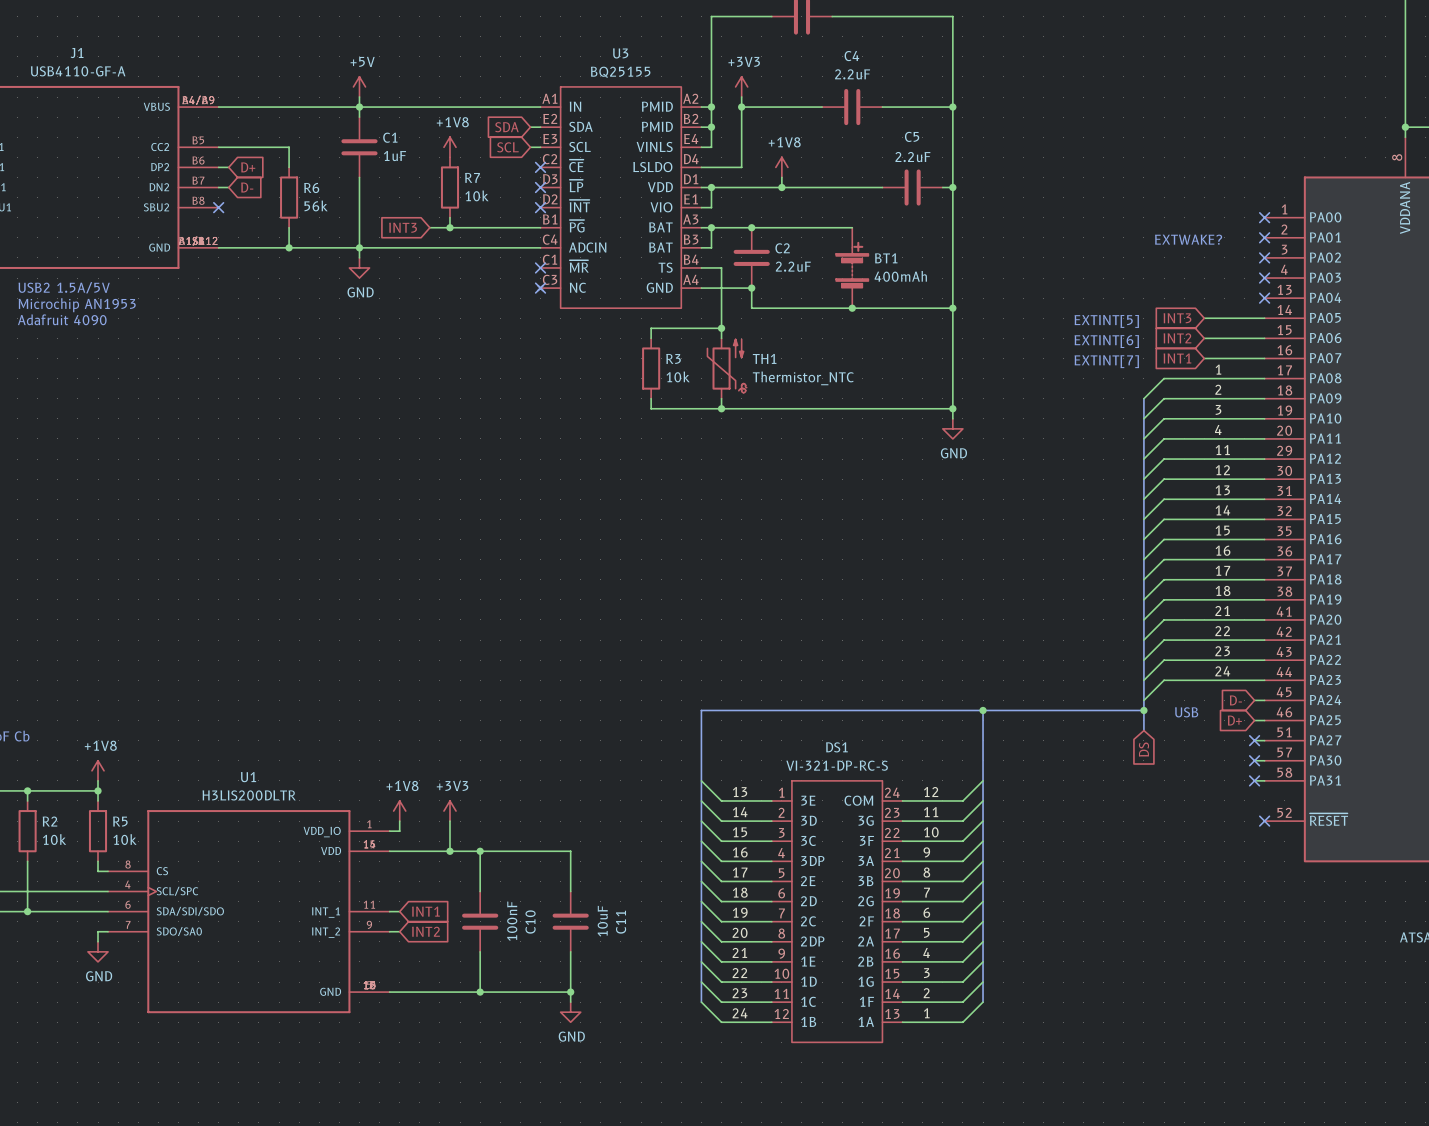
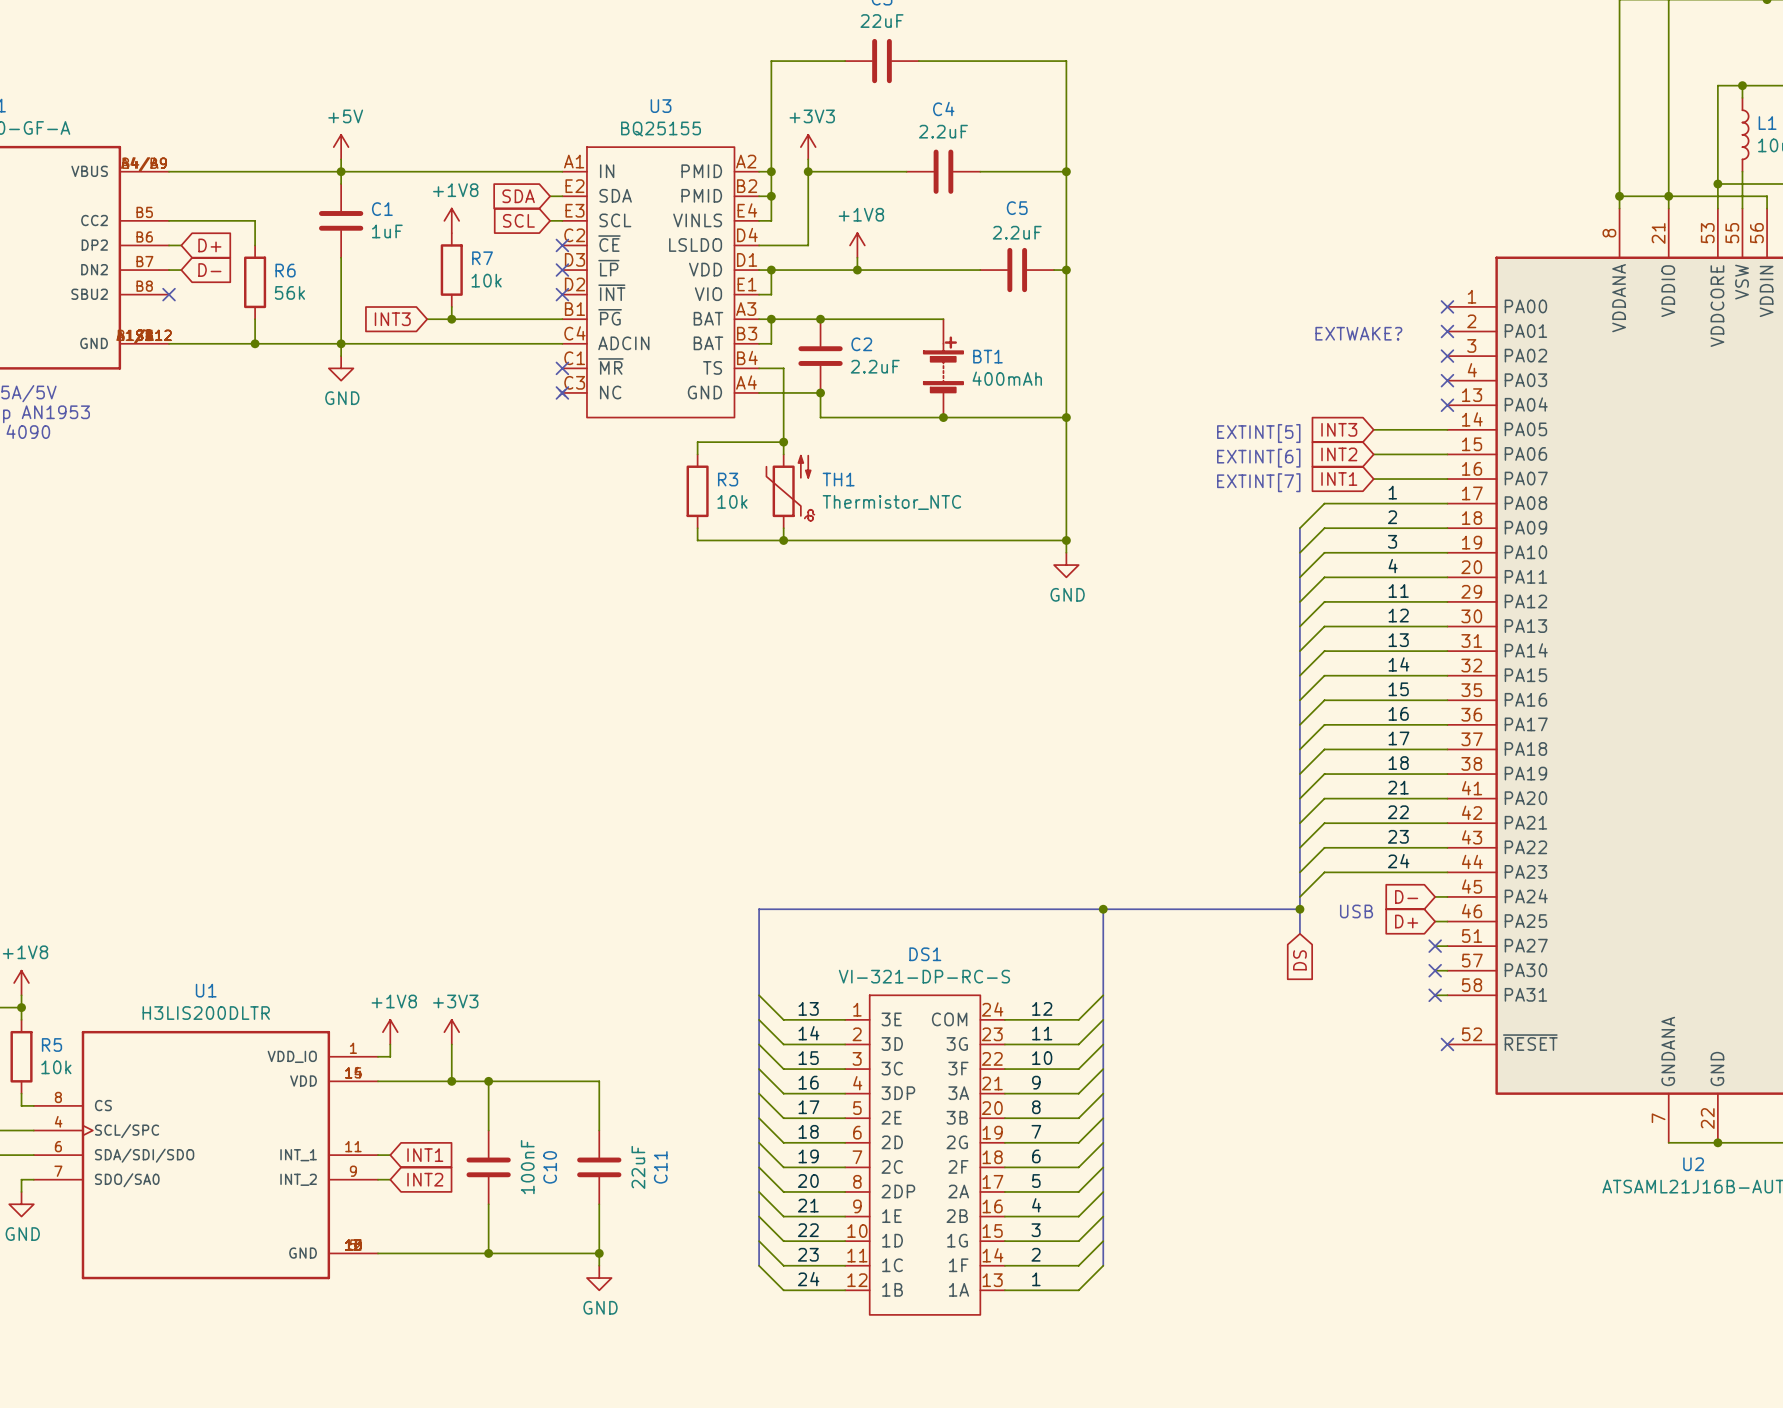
C11 value: 10uF (602, 921) -> 22uF (638, 1167)

